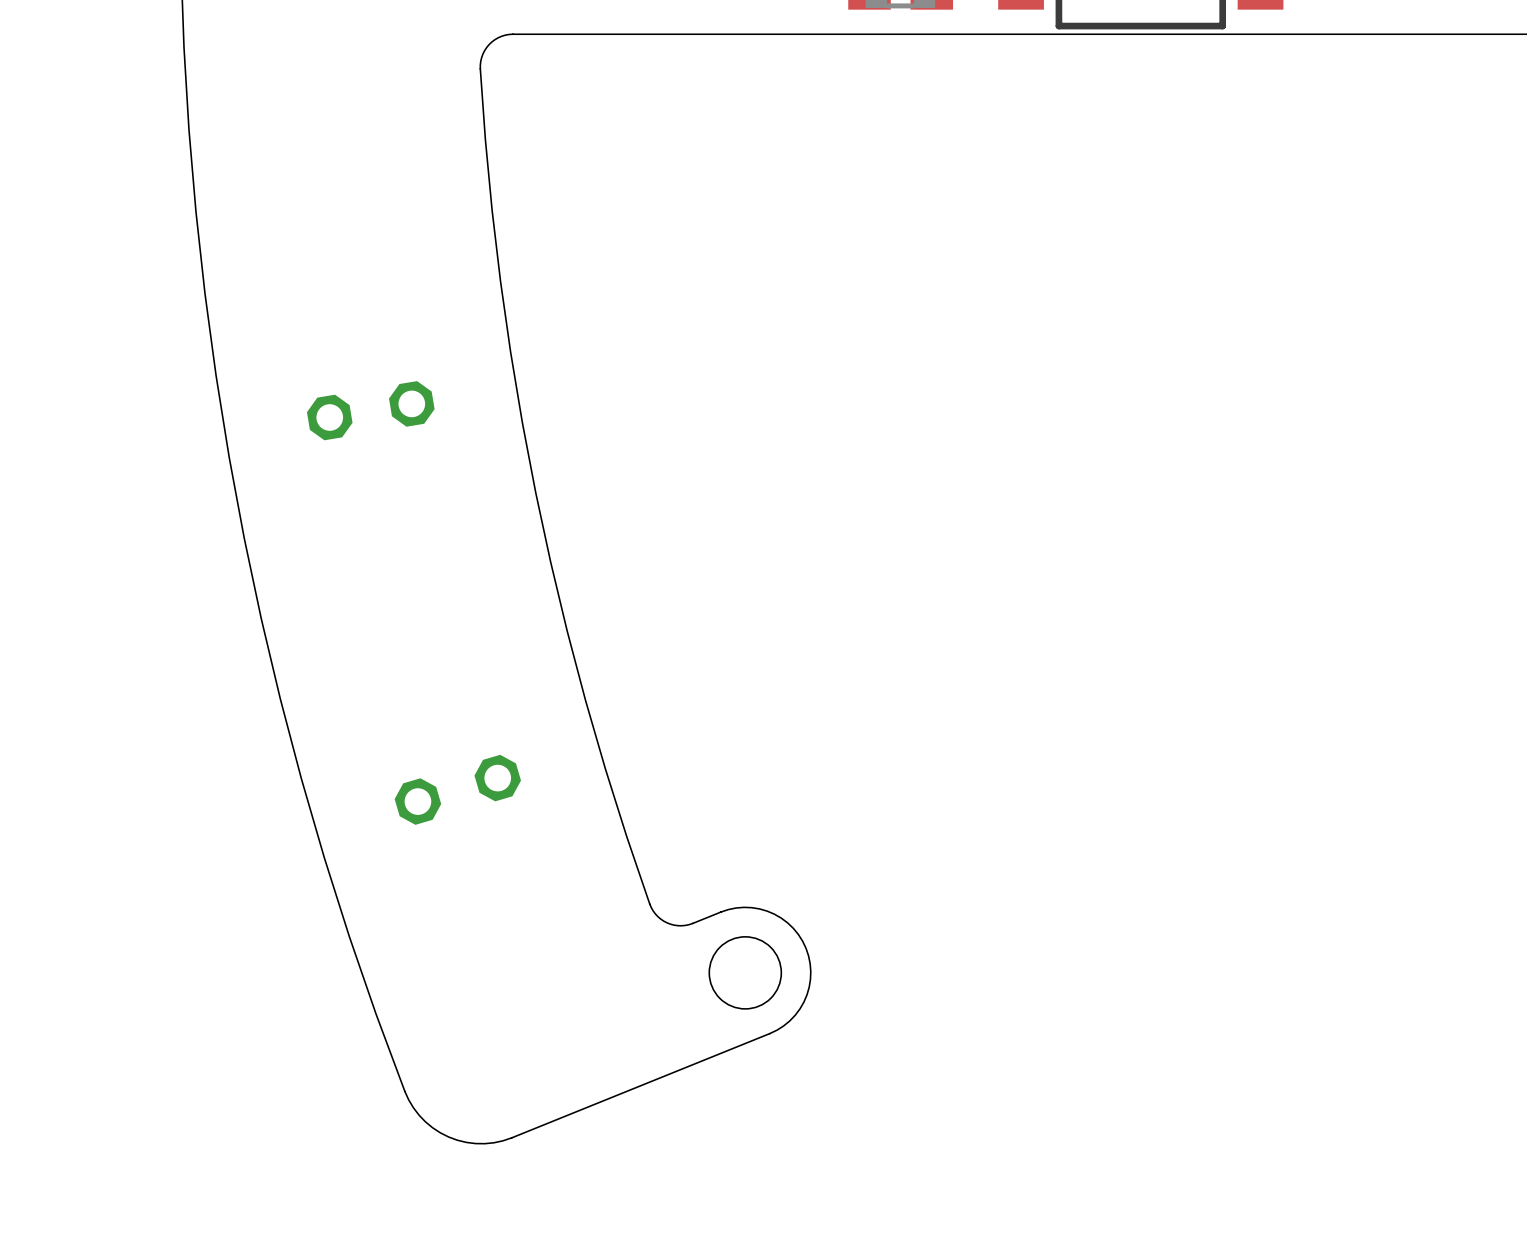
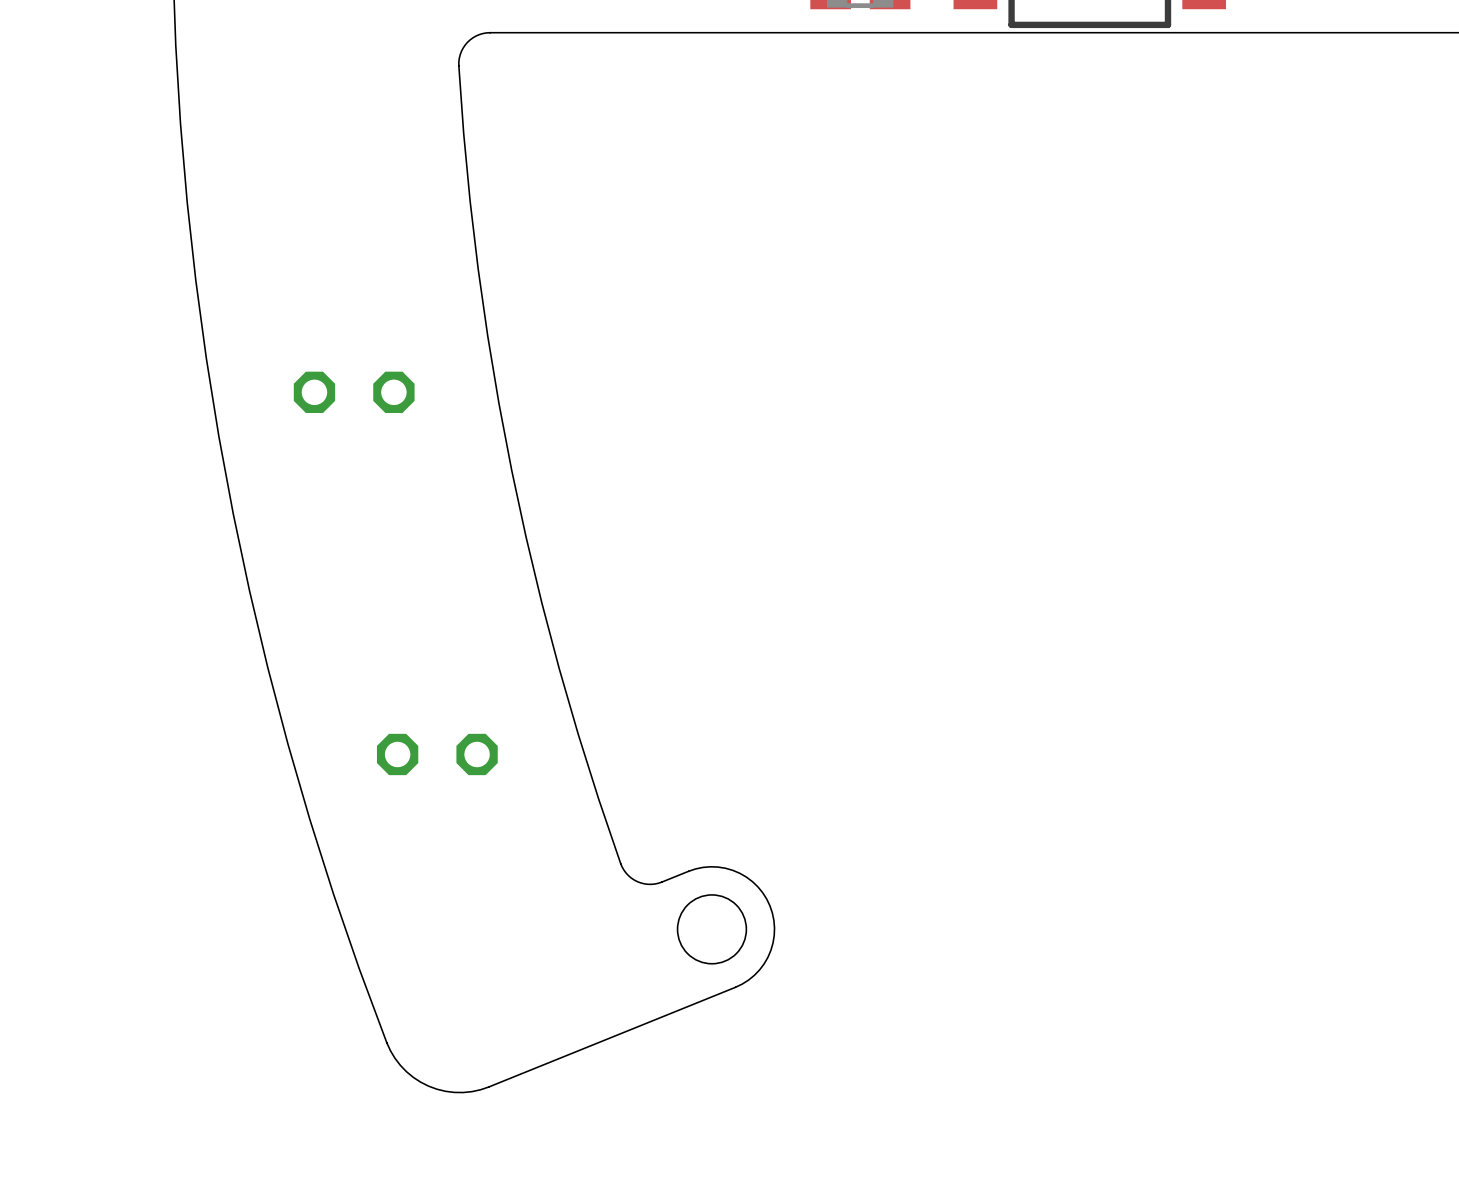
part rotation: 0° (370, 410) -> 9.4° clockwise (354, 392)
part rotation: 0° (457, 789) -> 16.4° clockwise (437, 754)

